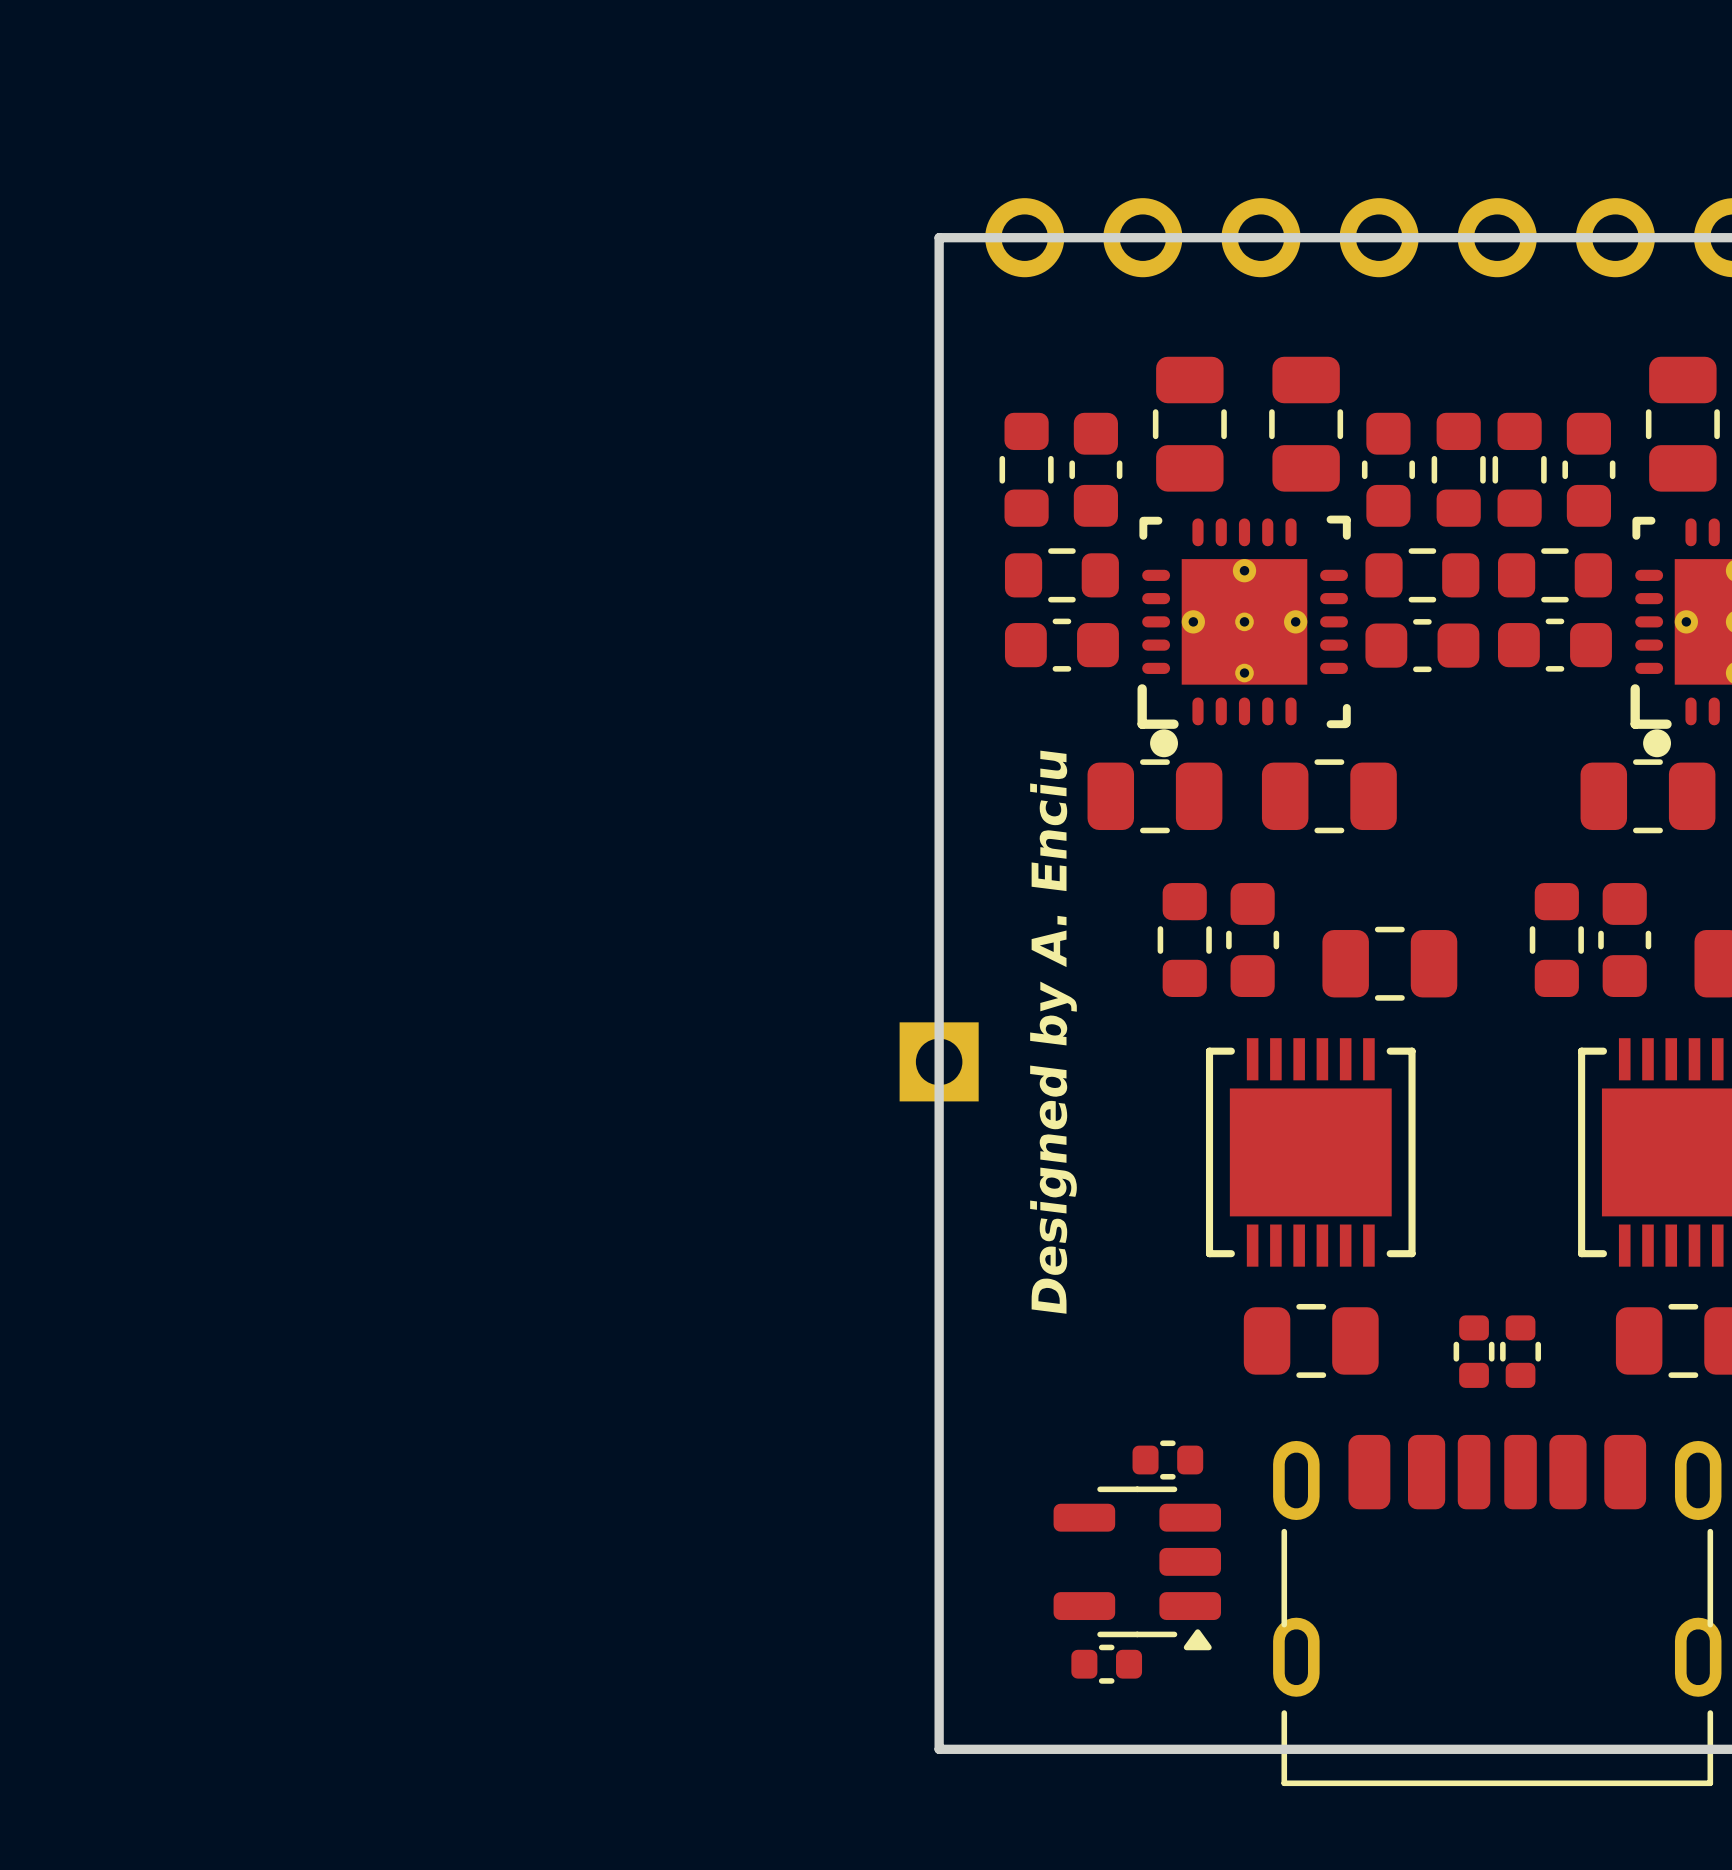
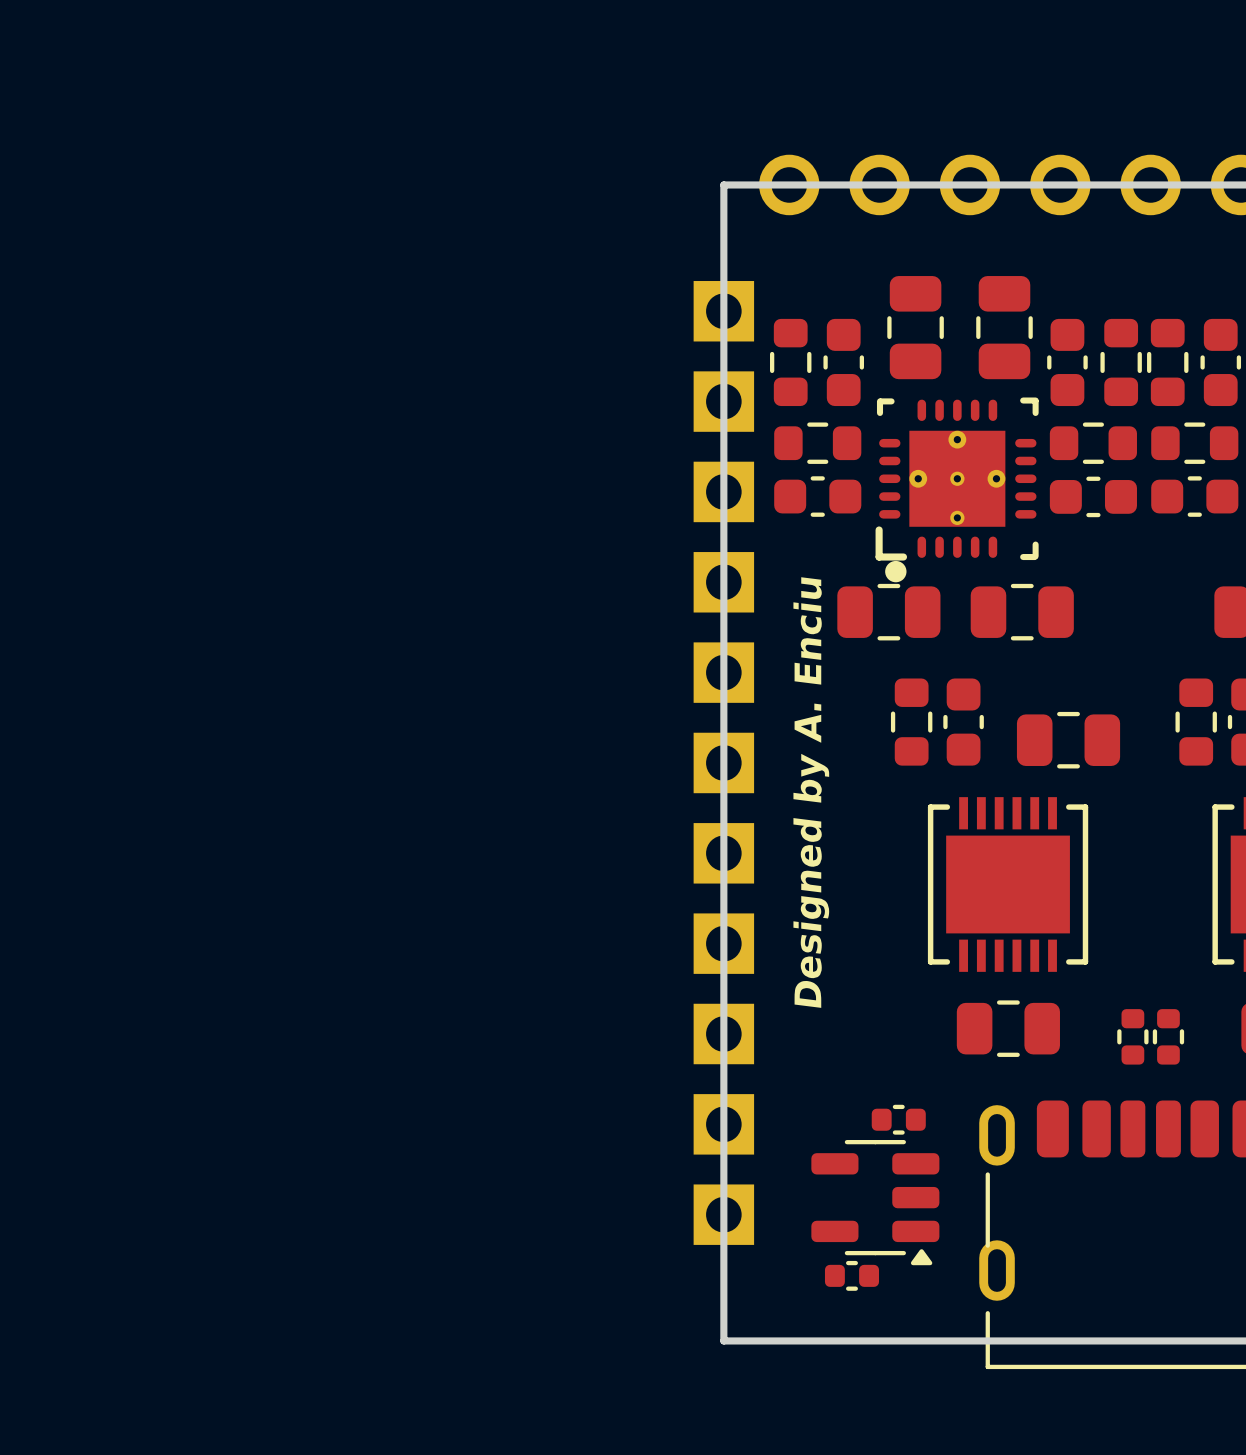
part: none -> (723, 311)
part: none -> (723, 401)
part: none -> (723, 491)
part: none -> (723, 582)
part: none -> (723, 672)
part: none -> (723, 762)
part: (939, 1061) -> none
part: none -> (723, 853)
part: none -> (723, 943)
part: none -> (723, 1034)
part: none -> (723, 1124)
part: none -> (723, 1214)

